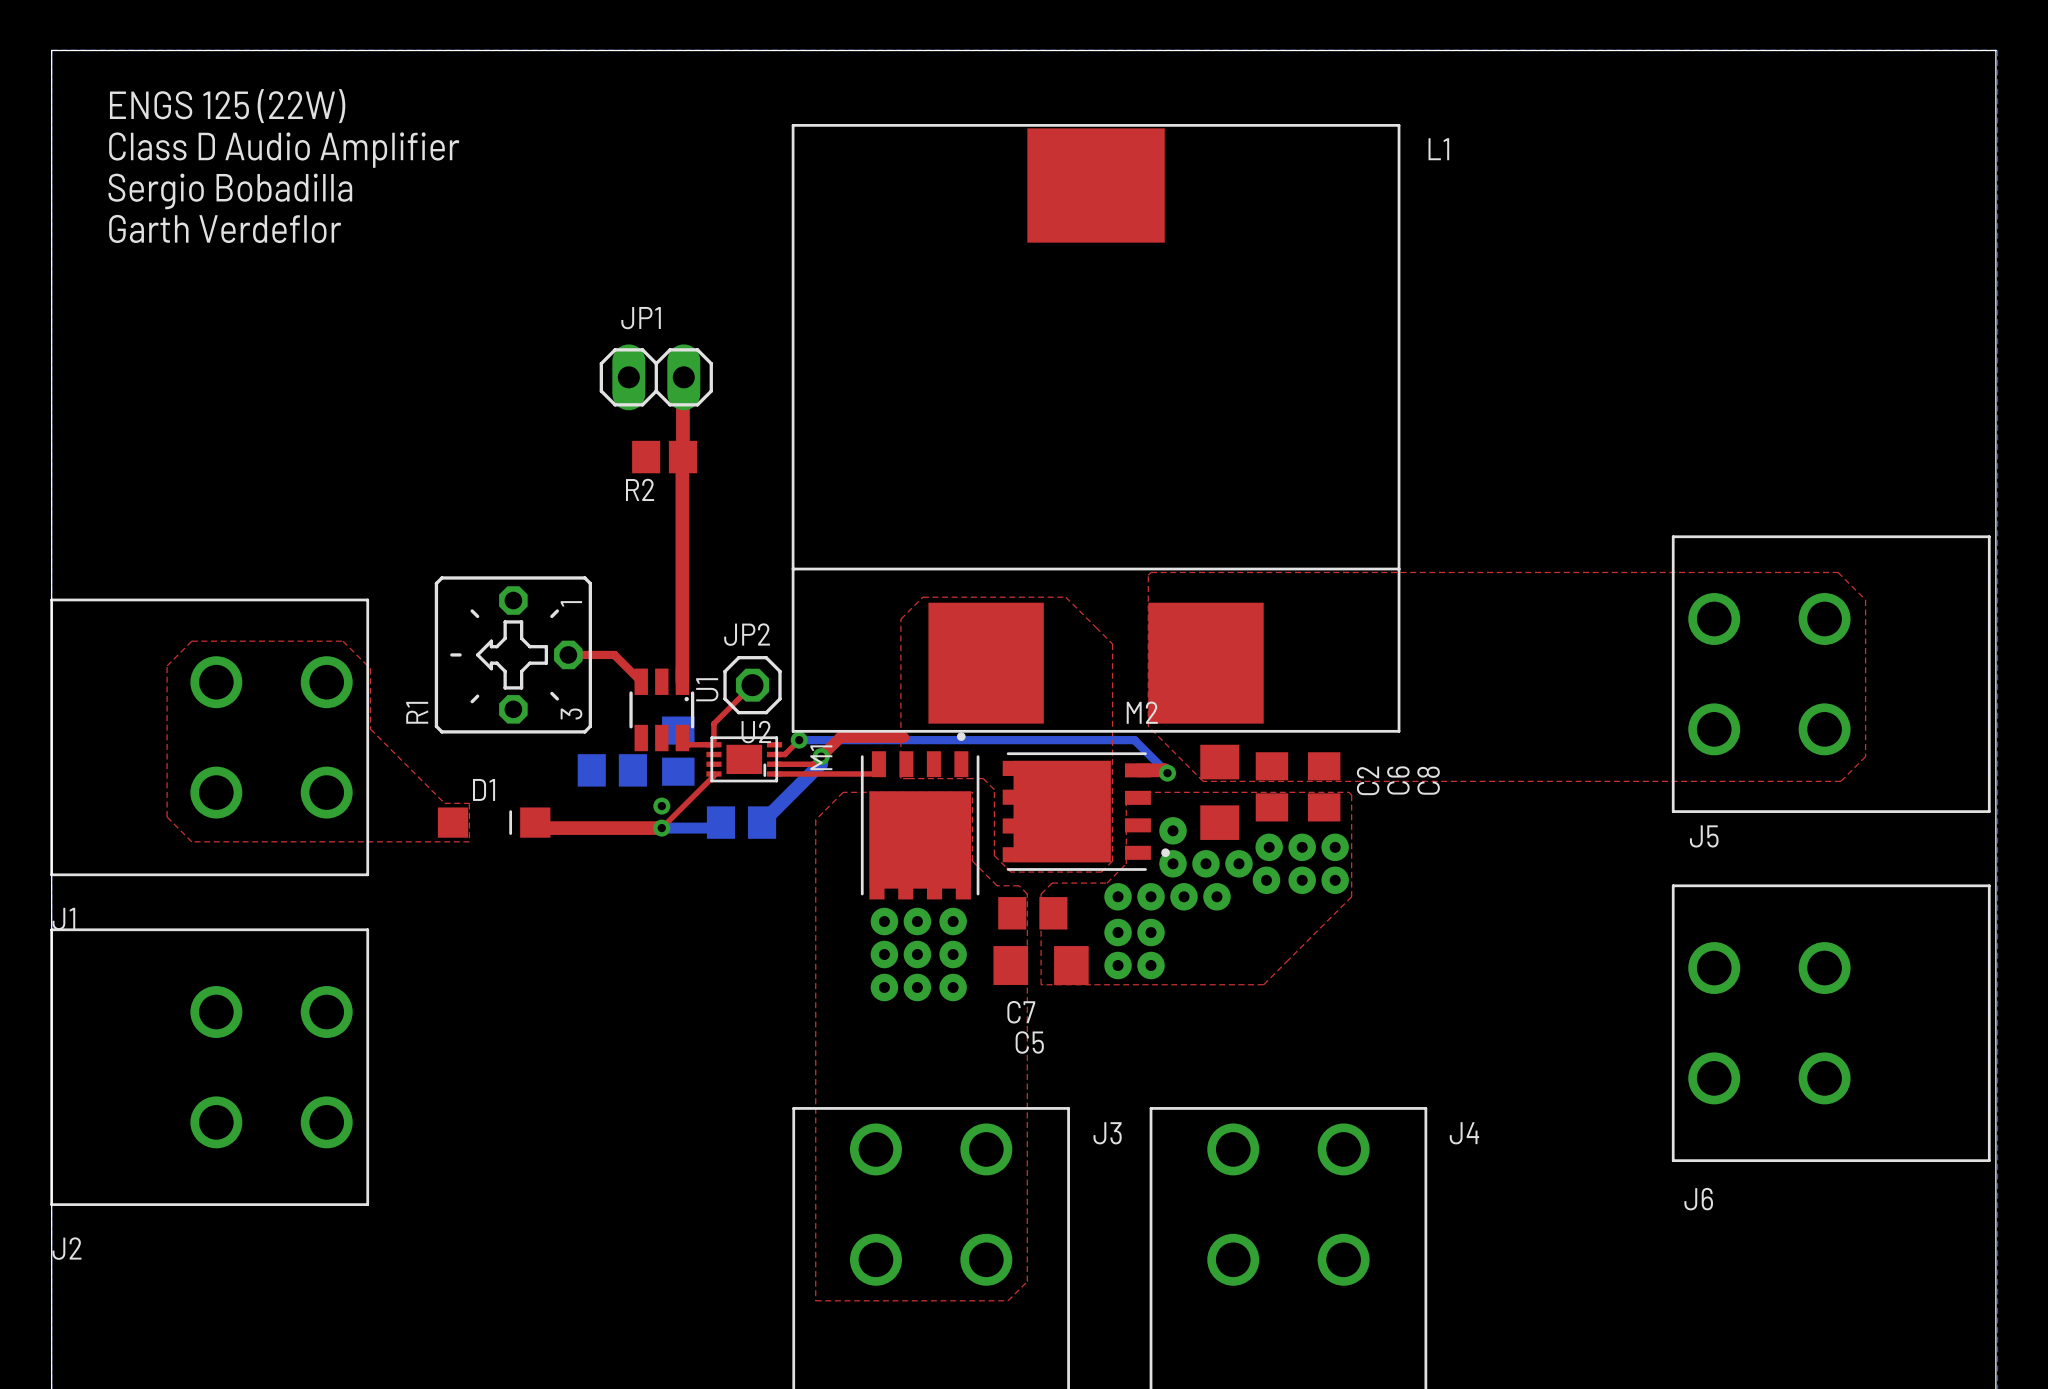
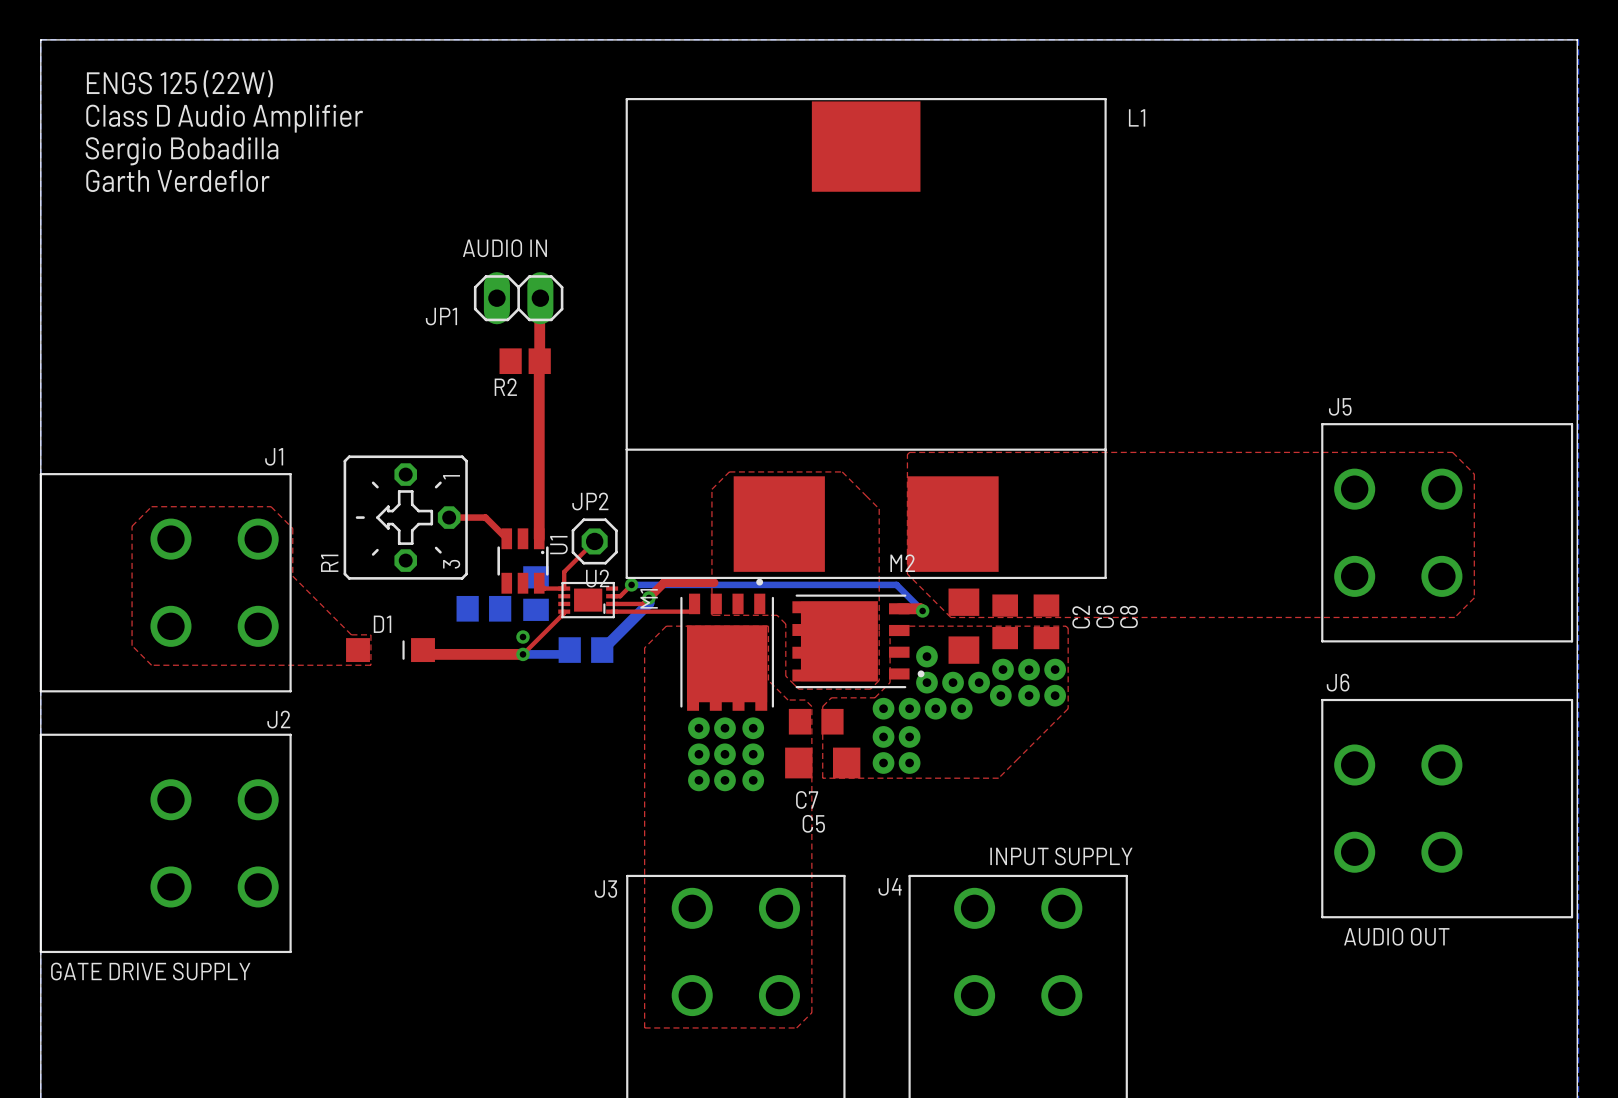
text: none -> AUDIO IN (504, 248)
JP1 name position: JP1 (641, 318) -> JP1 (441, 316)
J5 name position: J5 (1704, 836) -> J5 (1340, 406)
J1 name position: J1 (63, 918) -> J1 (274, 456)
text: none -> INPUT SUPPLY (1061, 856)
J3 name position: J3 (1107, 1133) -> J3 (605, 889)
J4 name position: J4 (1464, 1133) -> J4 (890, 886)
text: none -> AUDIO OUT (1396, 936)
J6 name position: J6 (1698, 1199) -> J6 (1338, 682)
text: none -> GATE DRIVE SUPPLY (150, 971)
J2 name position: J2 (66, 1248) -> J2 (278, 719)

